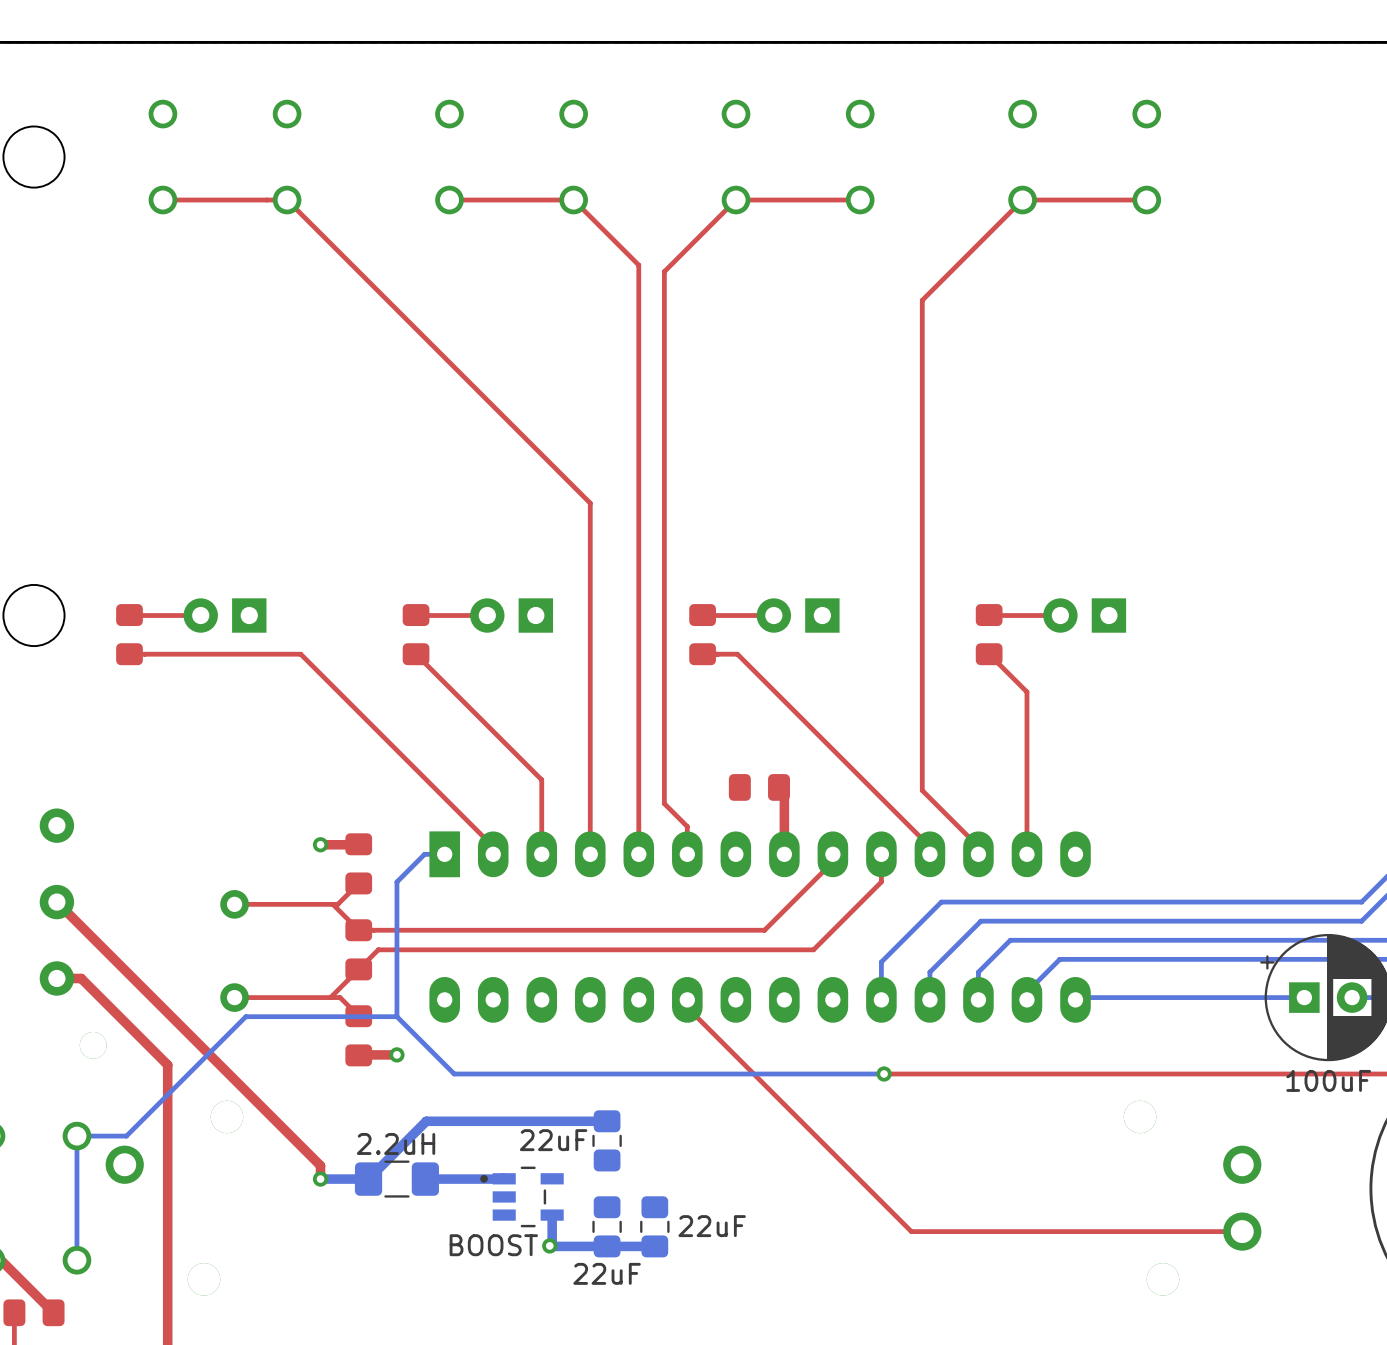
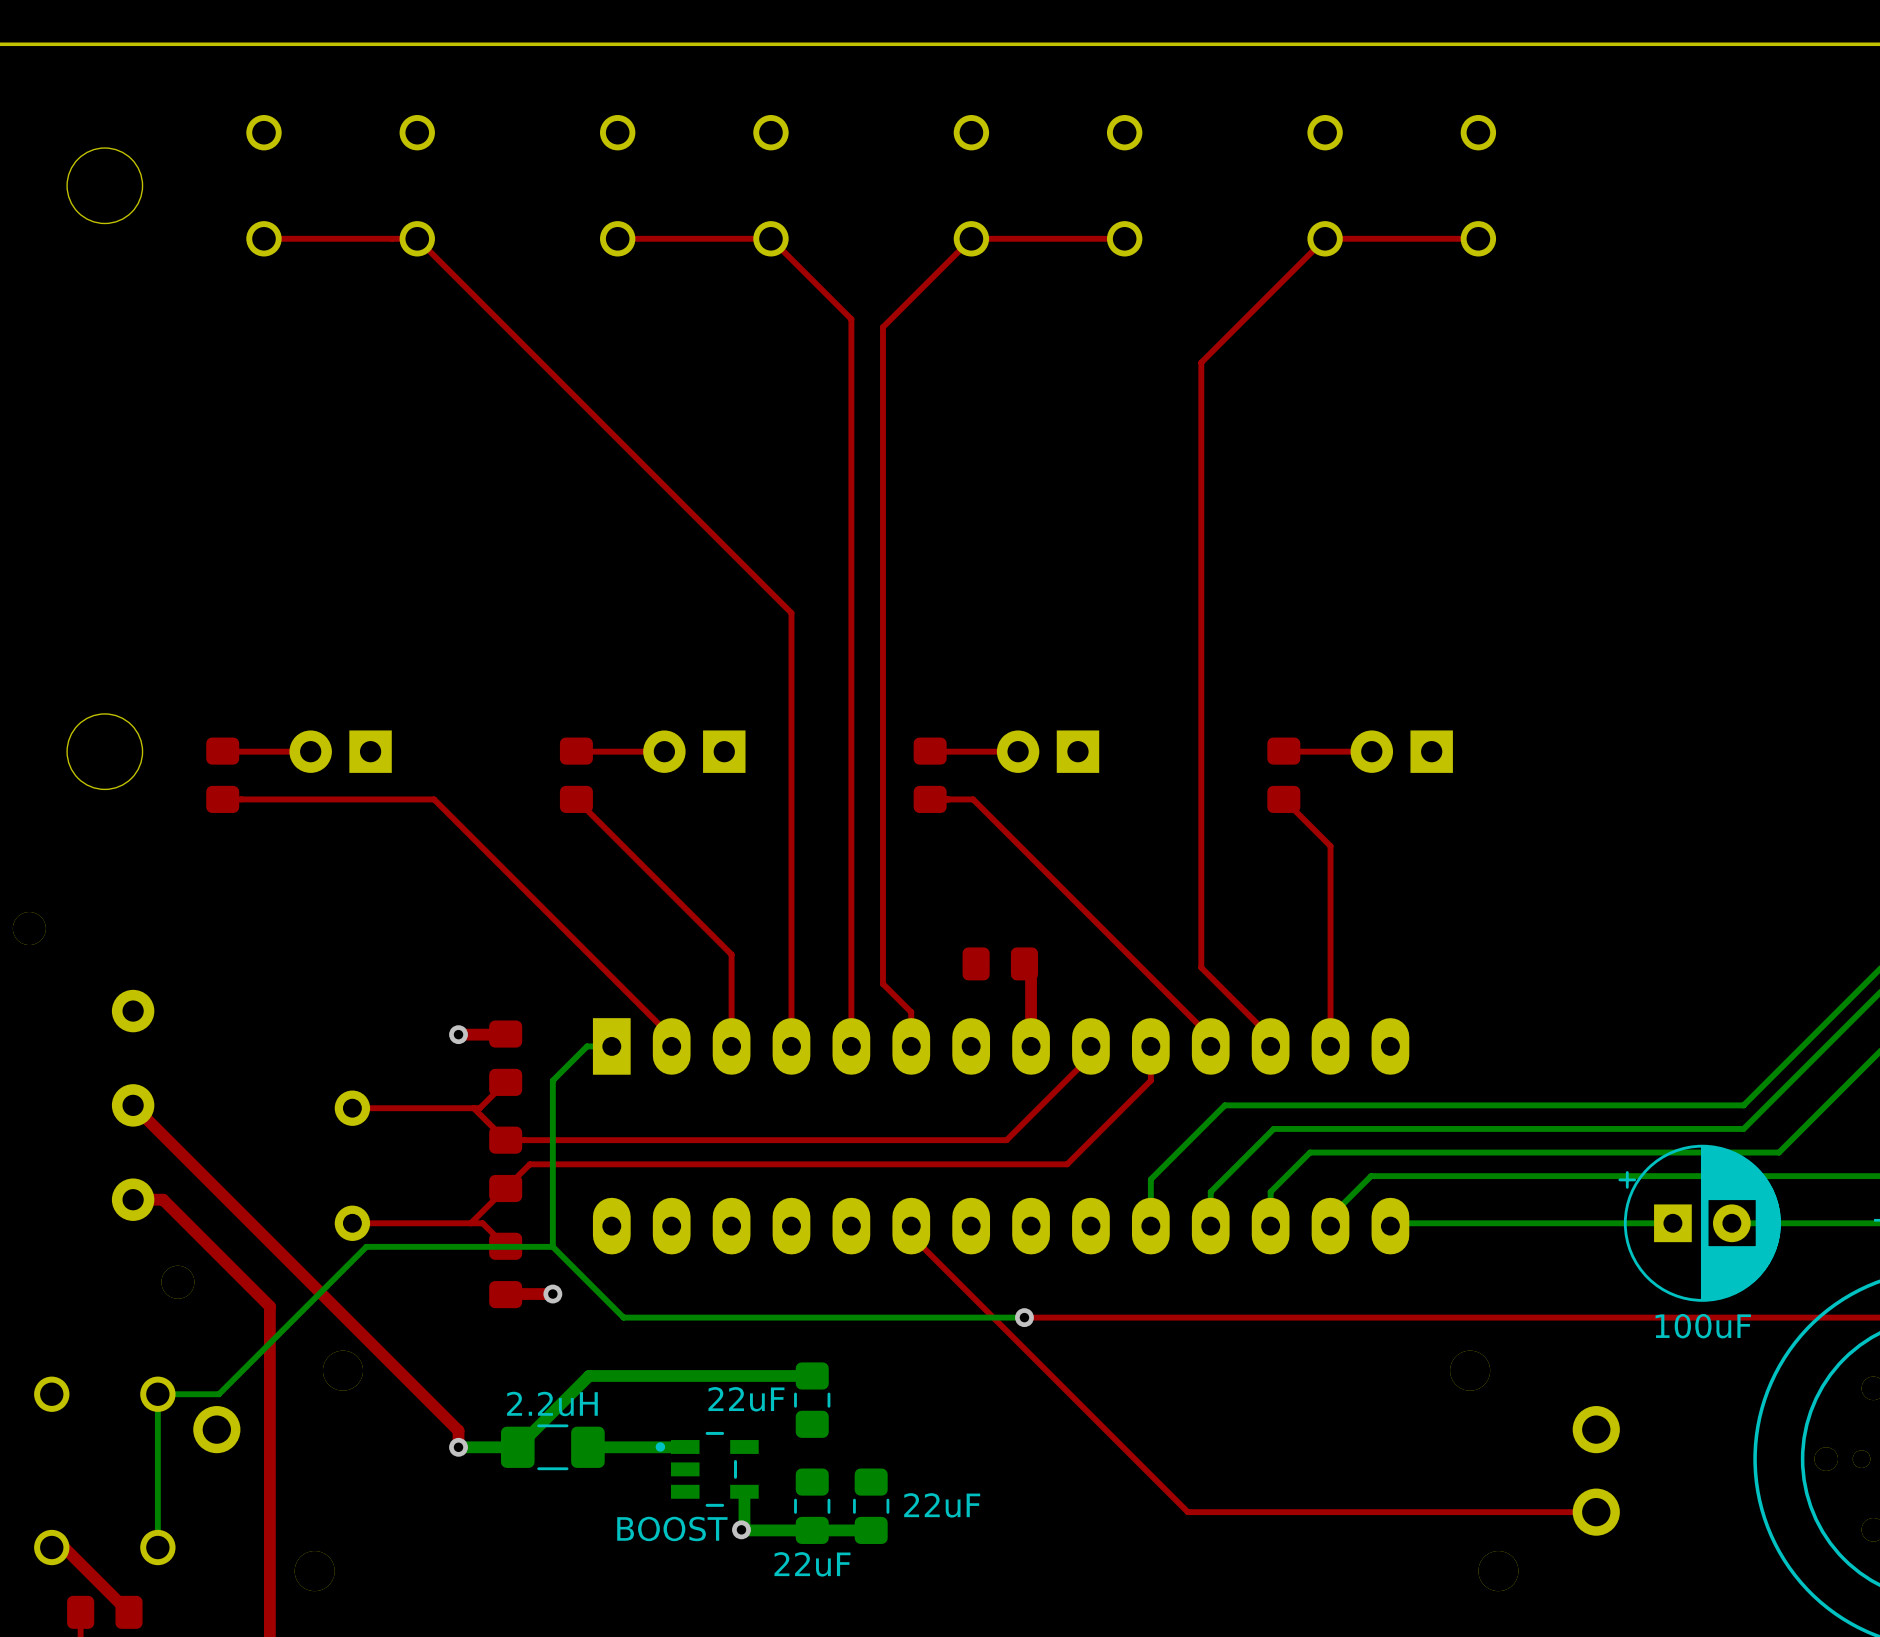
bottom track: (884, 1074) (779, 1074) -> none
top track: none -> (1154, 1317) (1024, 1317)
via position: (884, 1074) -> (1024, 1317)

